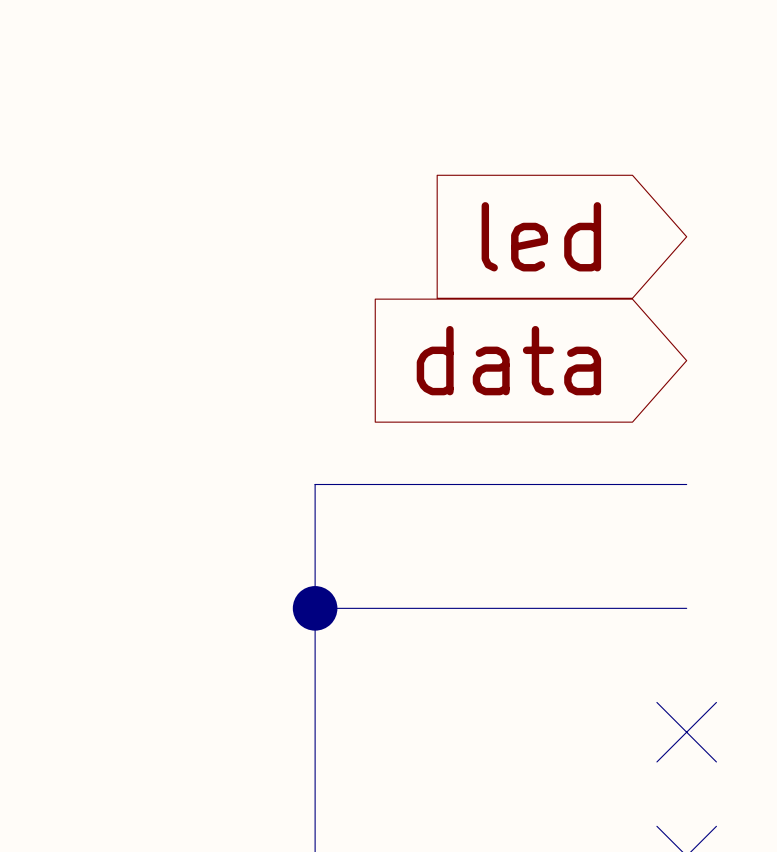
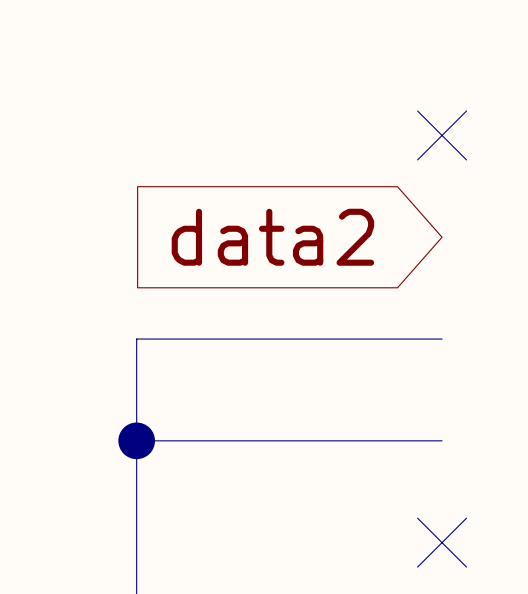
global label: led (541, 236) -> none
no-connect mark: none -> (442, 135)
global label: data (508, 360) -> data2 (272, 237)

